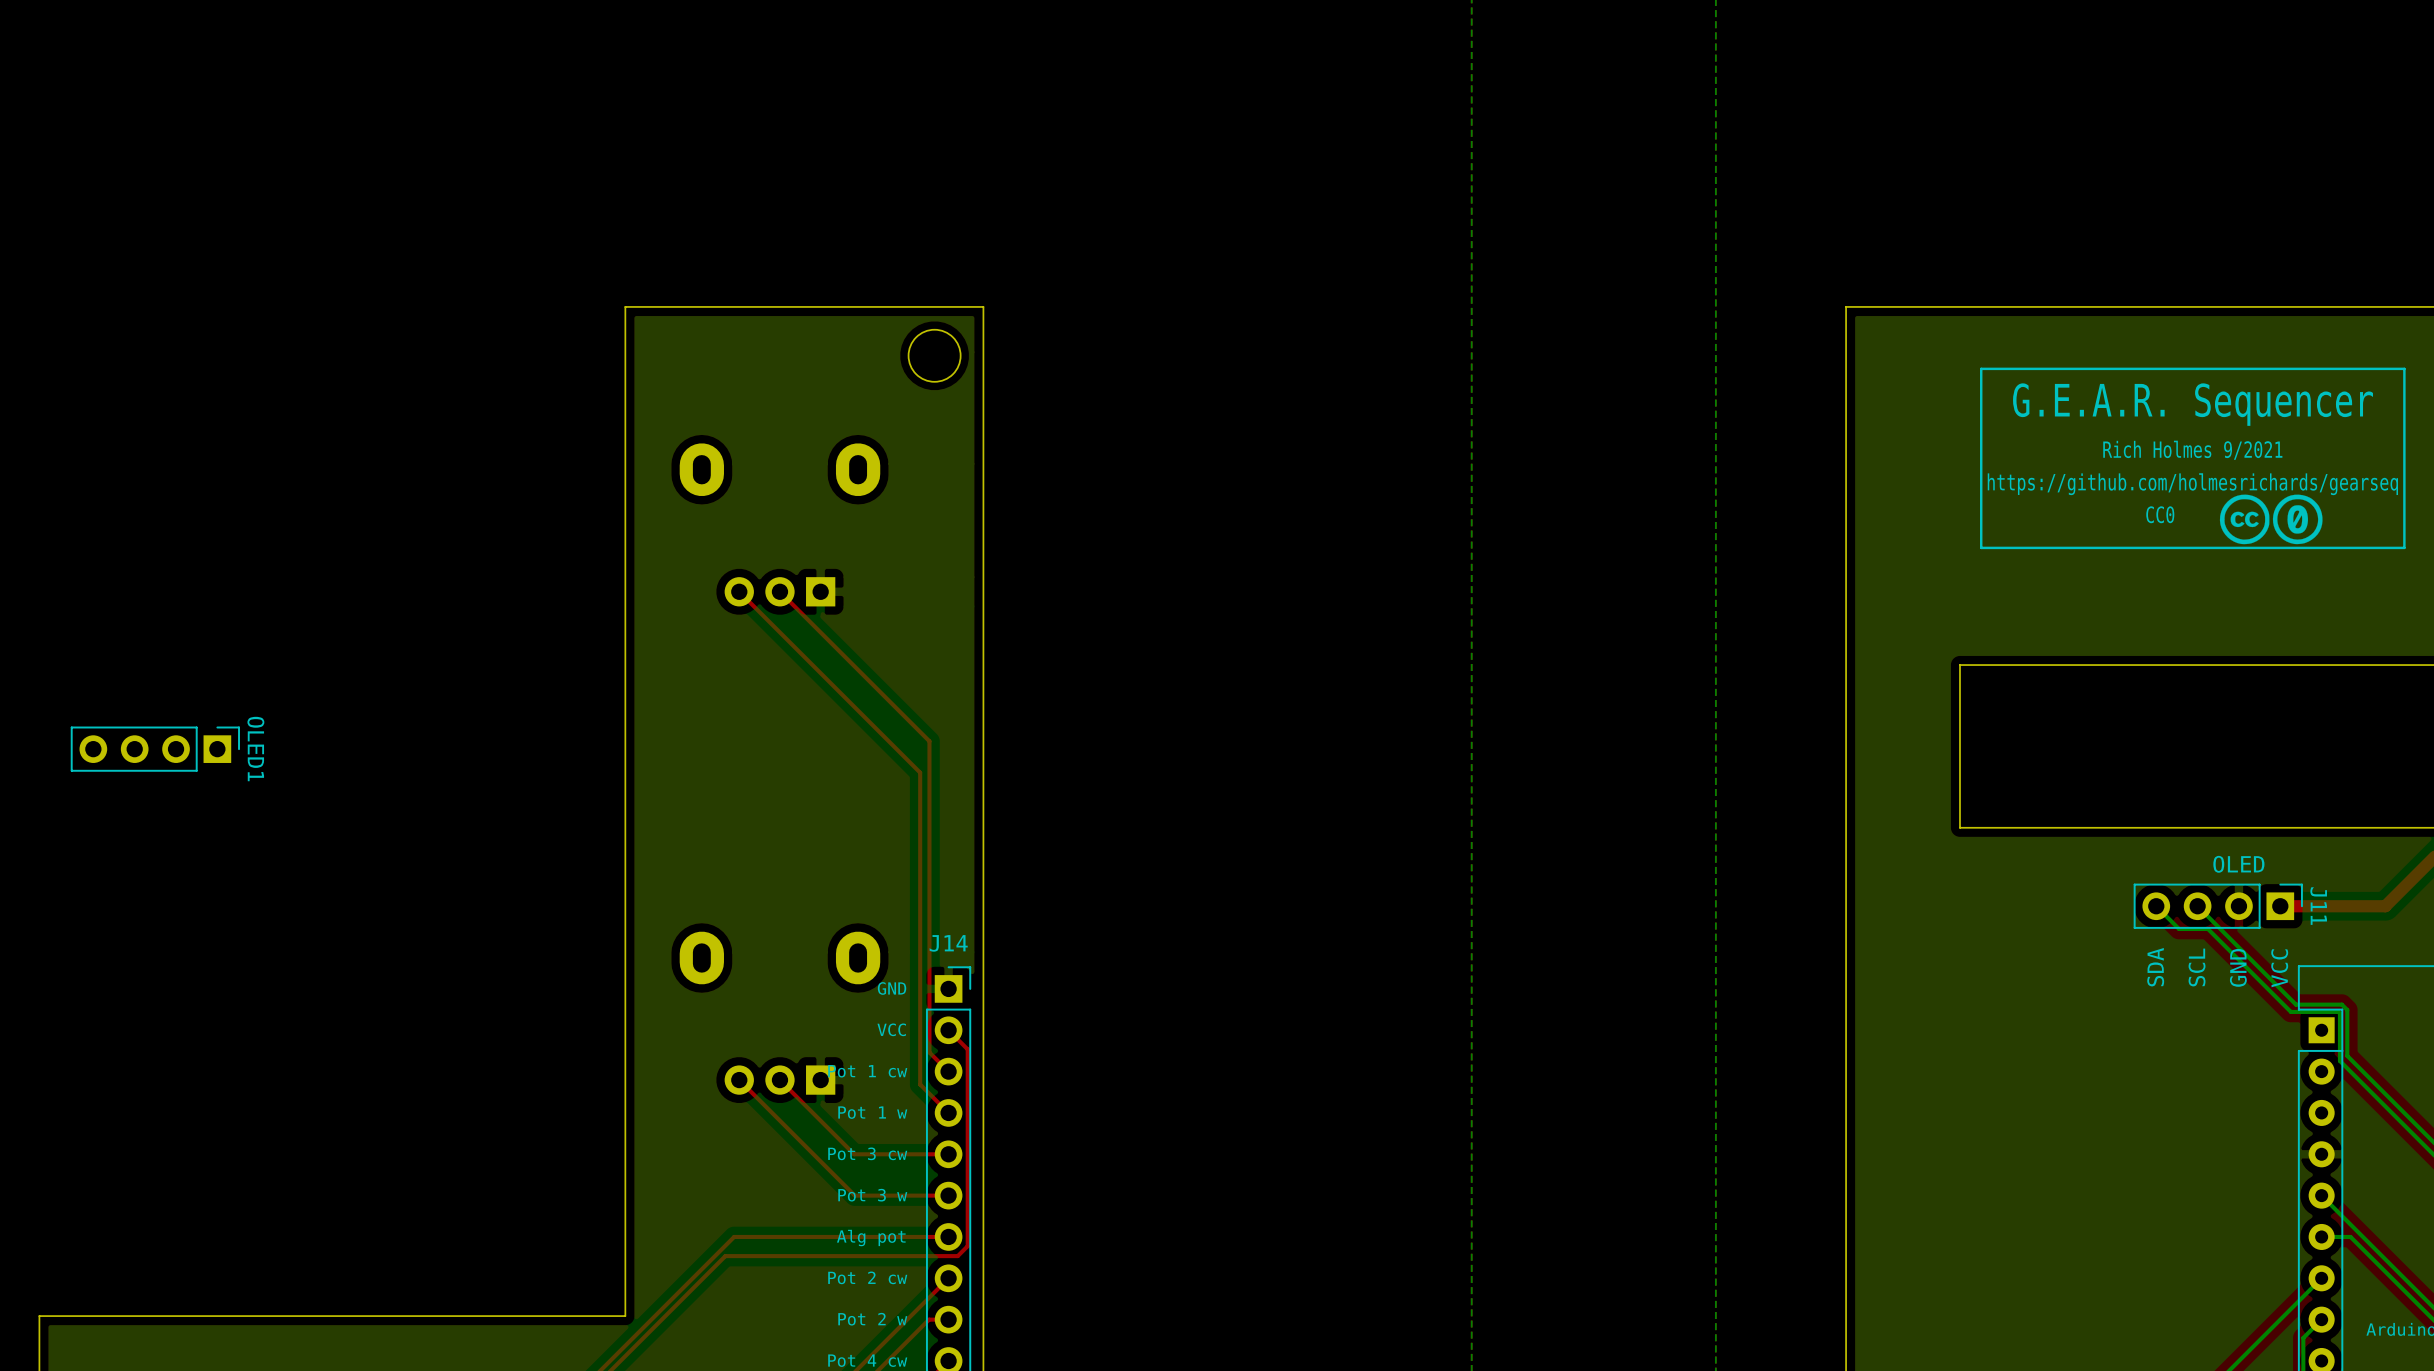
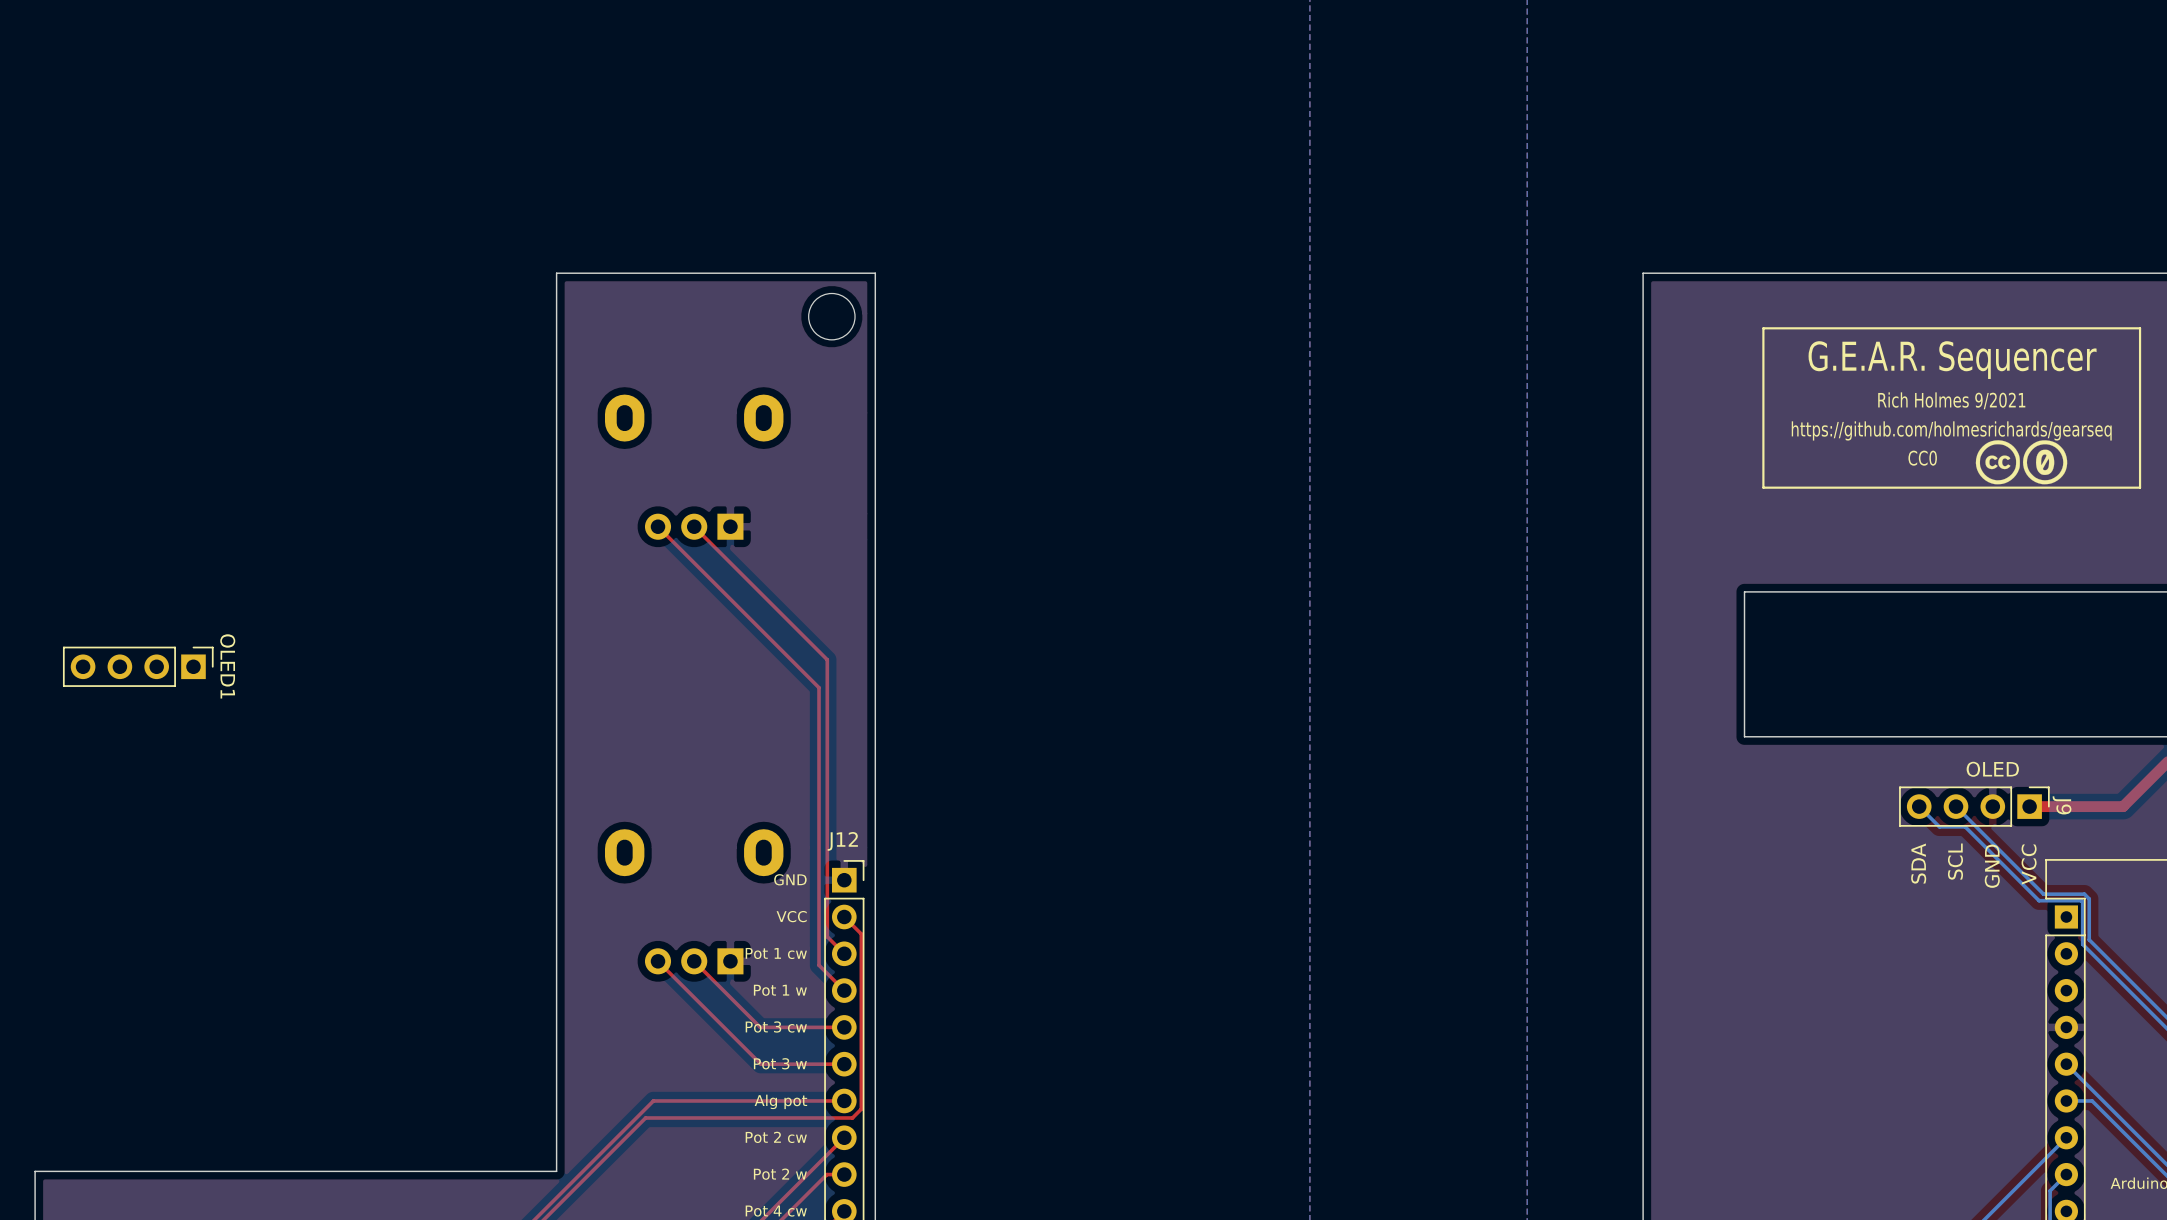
J11 name: J11 (2318, 906) -> J9 (2062, 805)
J14 name: J14 (948, 943) -> J12 (842, 841)

